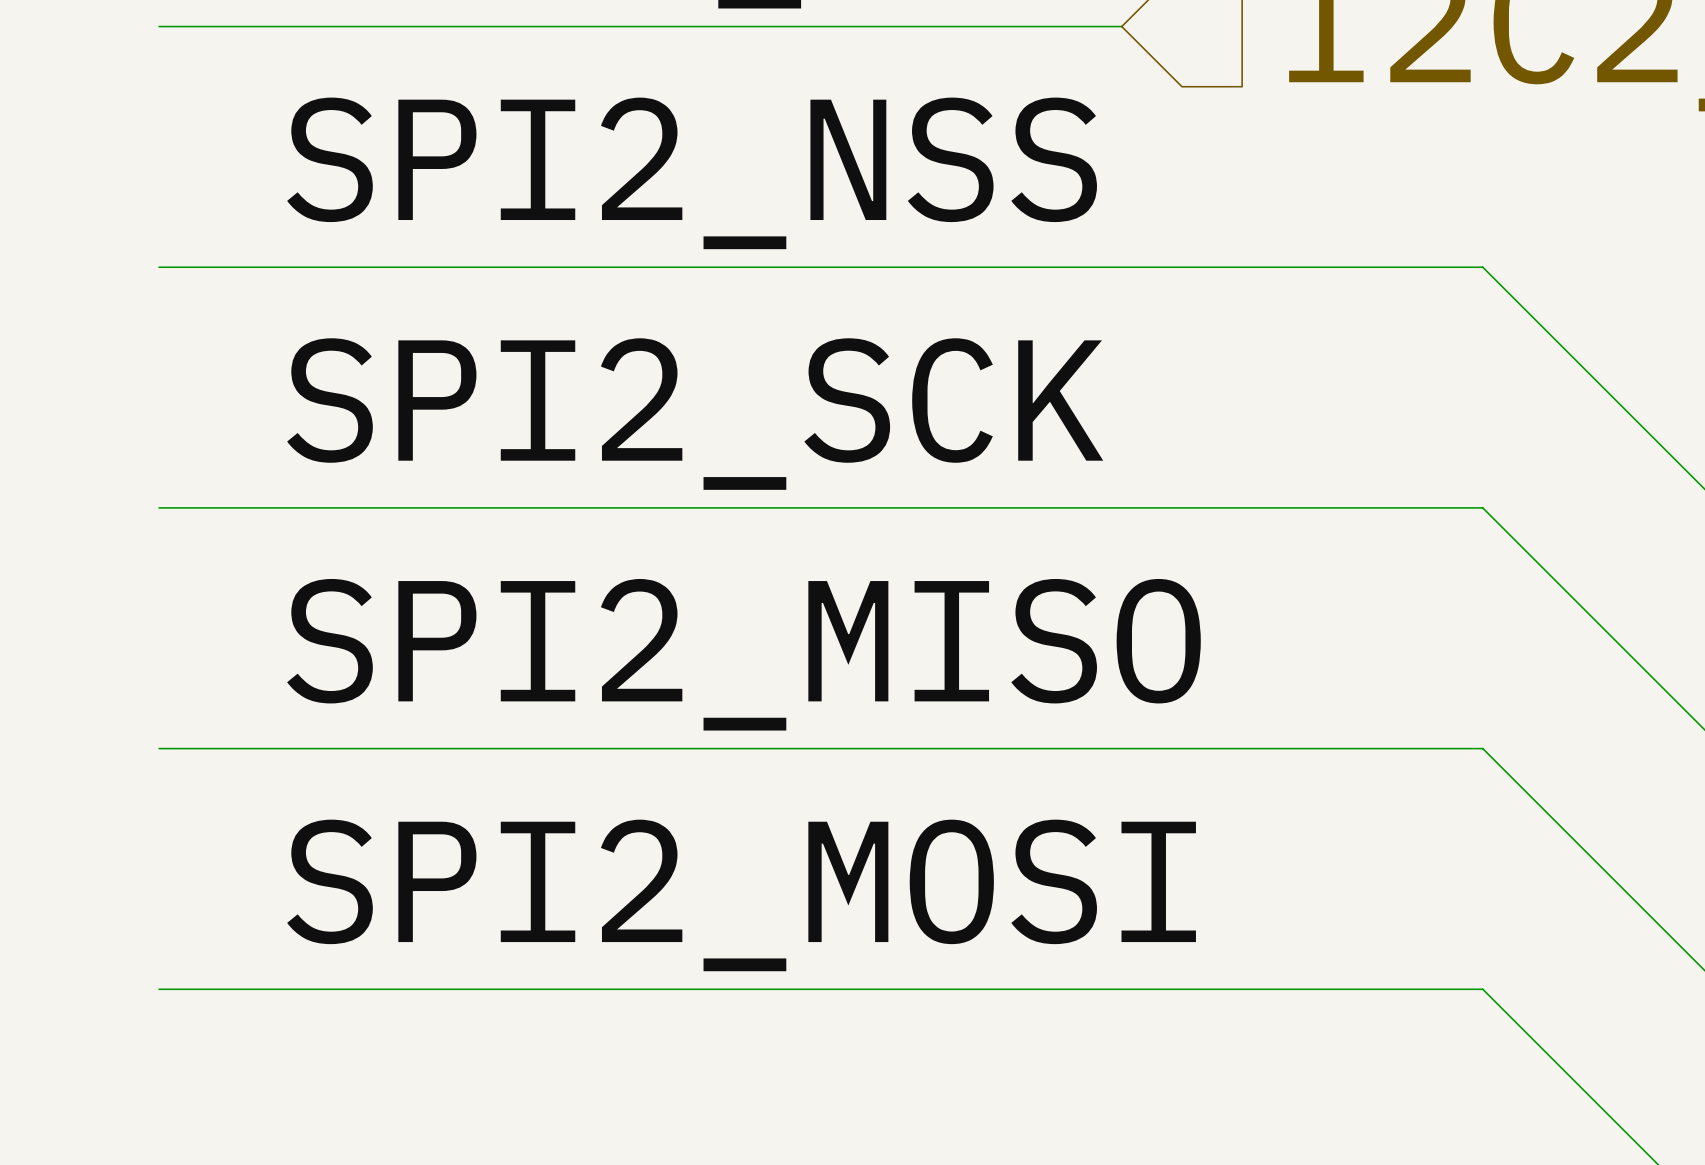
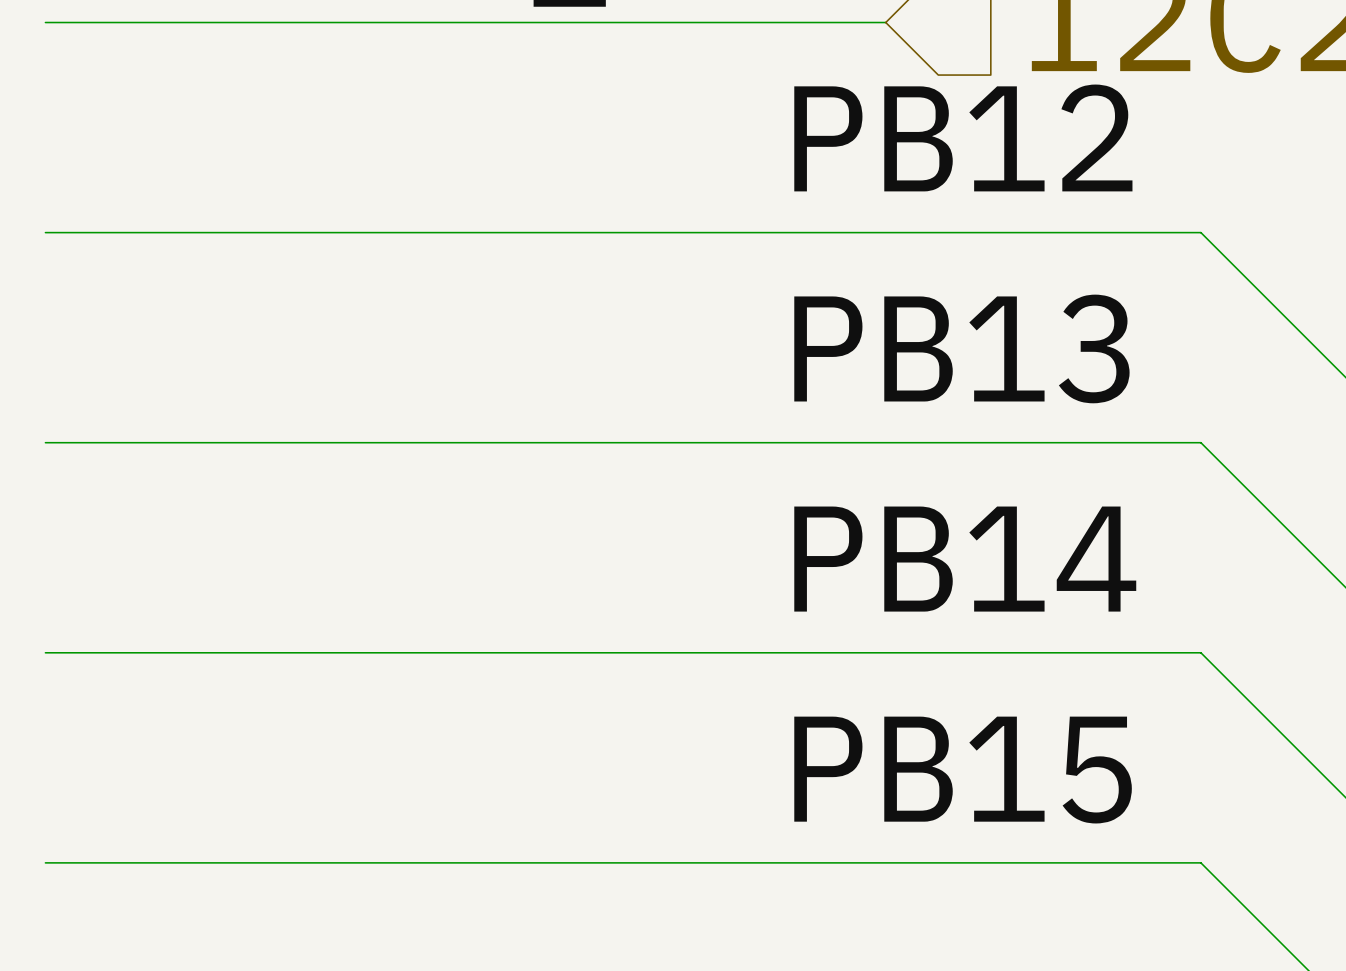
label: none -> PB12 (963, 137)
label: SPI2_NSS (692, 173) -> none
label: none -> PB13 (961, 348)
label: SPI2_SCK (695, 414) -> none
label: none -> PB14 (965, 559)
label: SPI2_MISO (743, 654) -> none
label: none -> PB15 (963, 770)
label: SPI2_MOSI (741, 895) -> none

